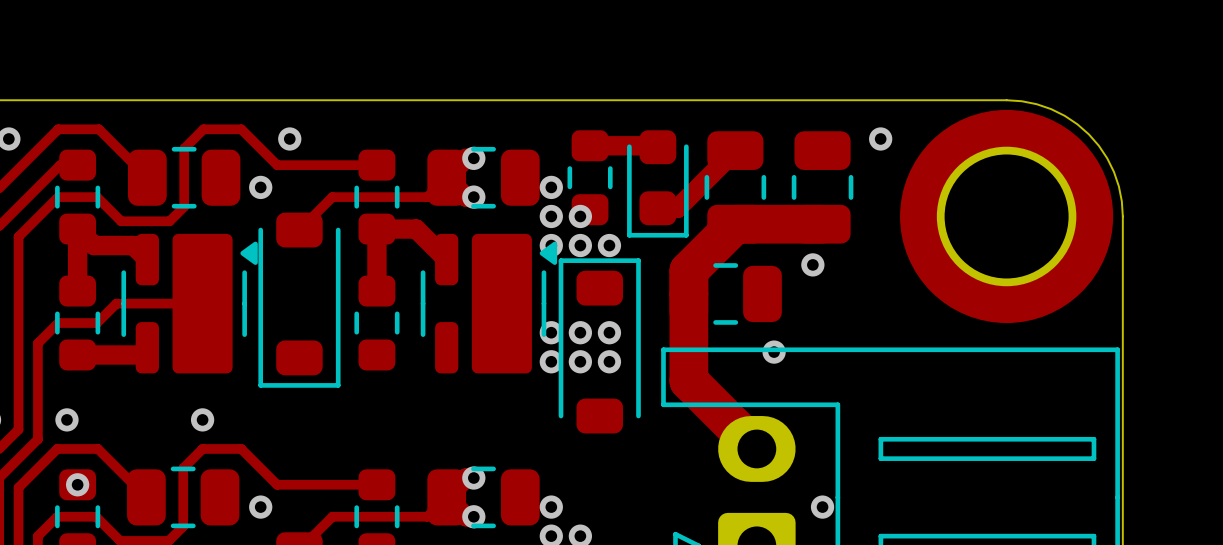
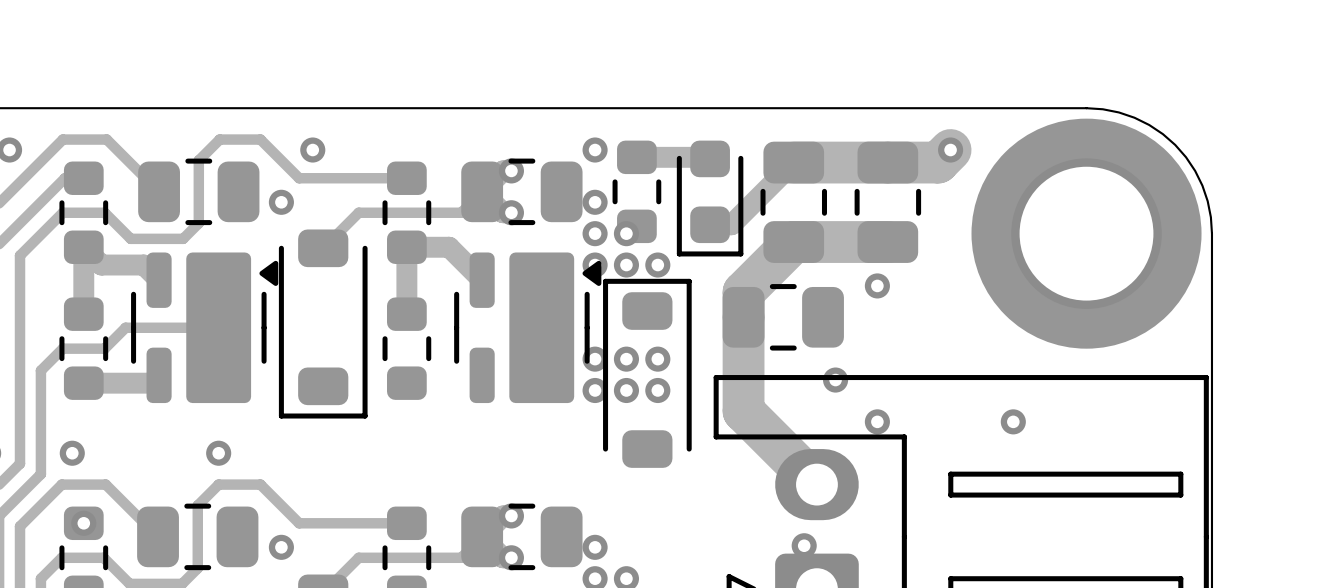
via: none -> (595, 150)
track: none -> (950, 150) (938, 162) (793, 162)
via: none -> (877, 421)
via: none -> (1013, 421)
via: none -> (804, 545)
via: (822, 507) -> none

